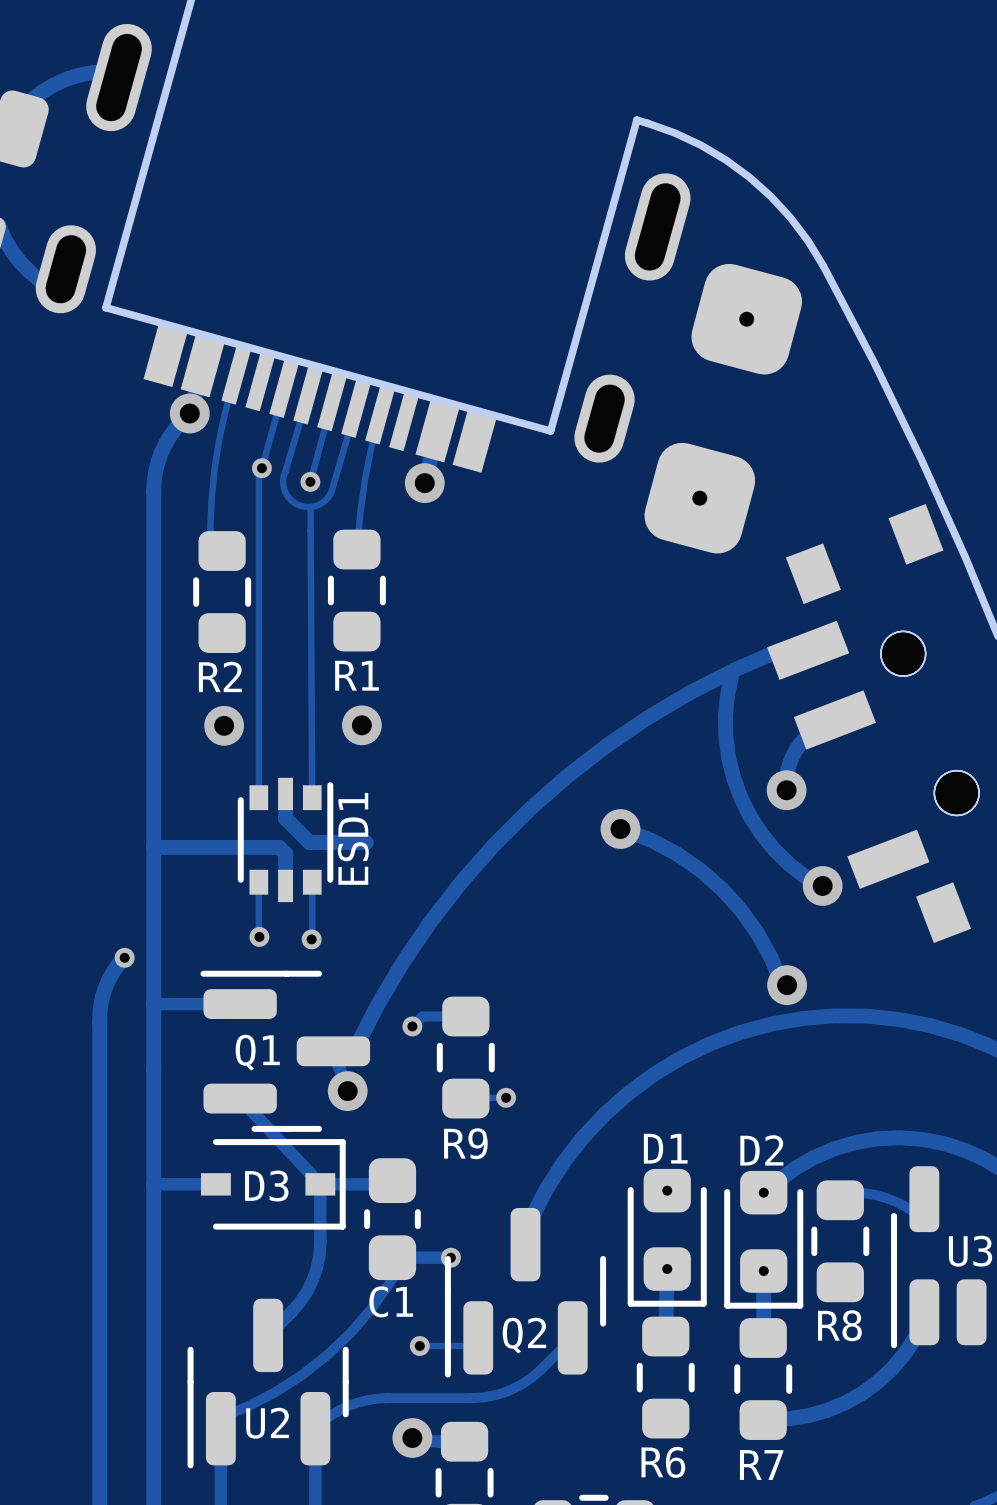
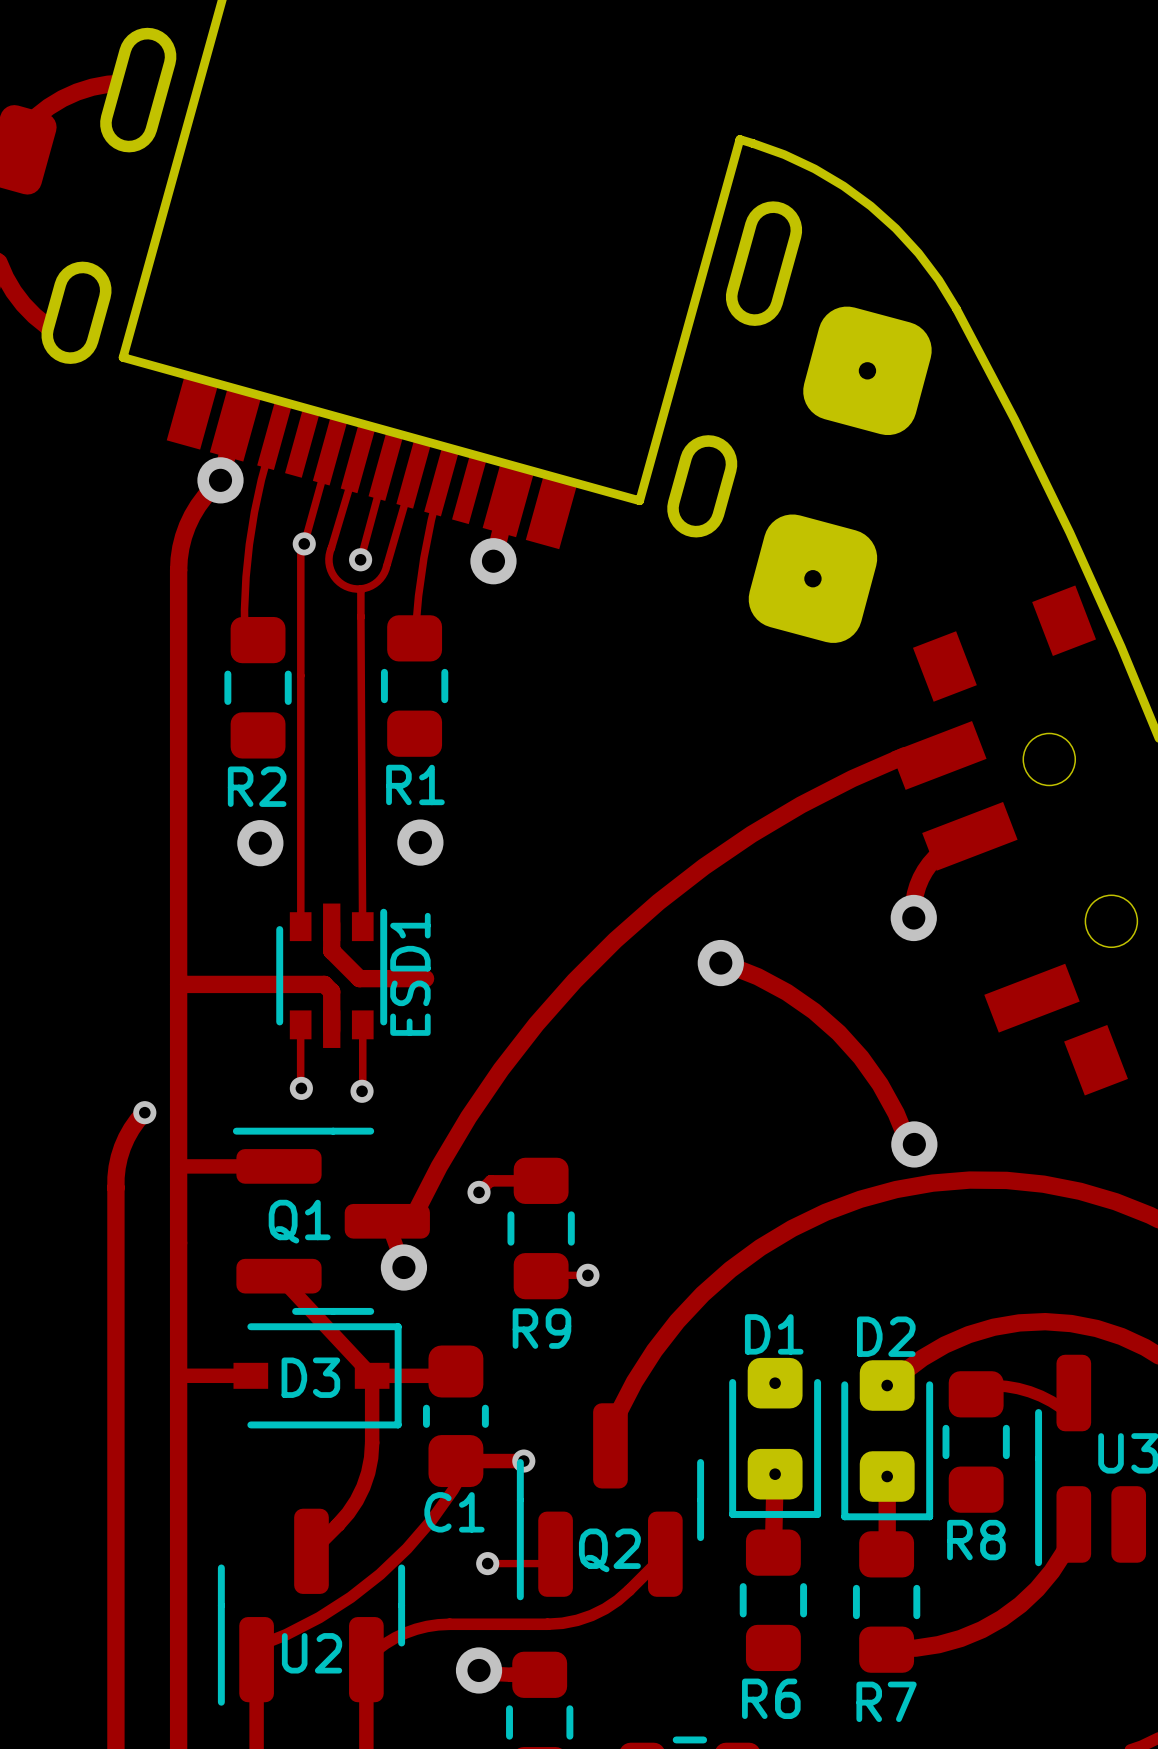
track: (731, 674) (727, 694) (725, 736) (733, 777) (740, 797) (749, 816) (774, 849) (806, 877) (823, 888) -> none
part: (929, 723) -> none
via: (822, 885) -> none

